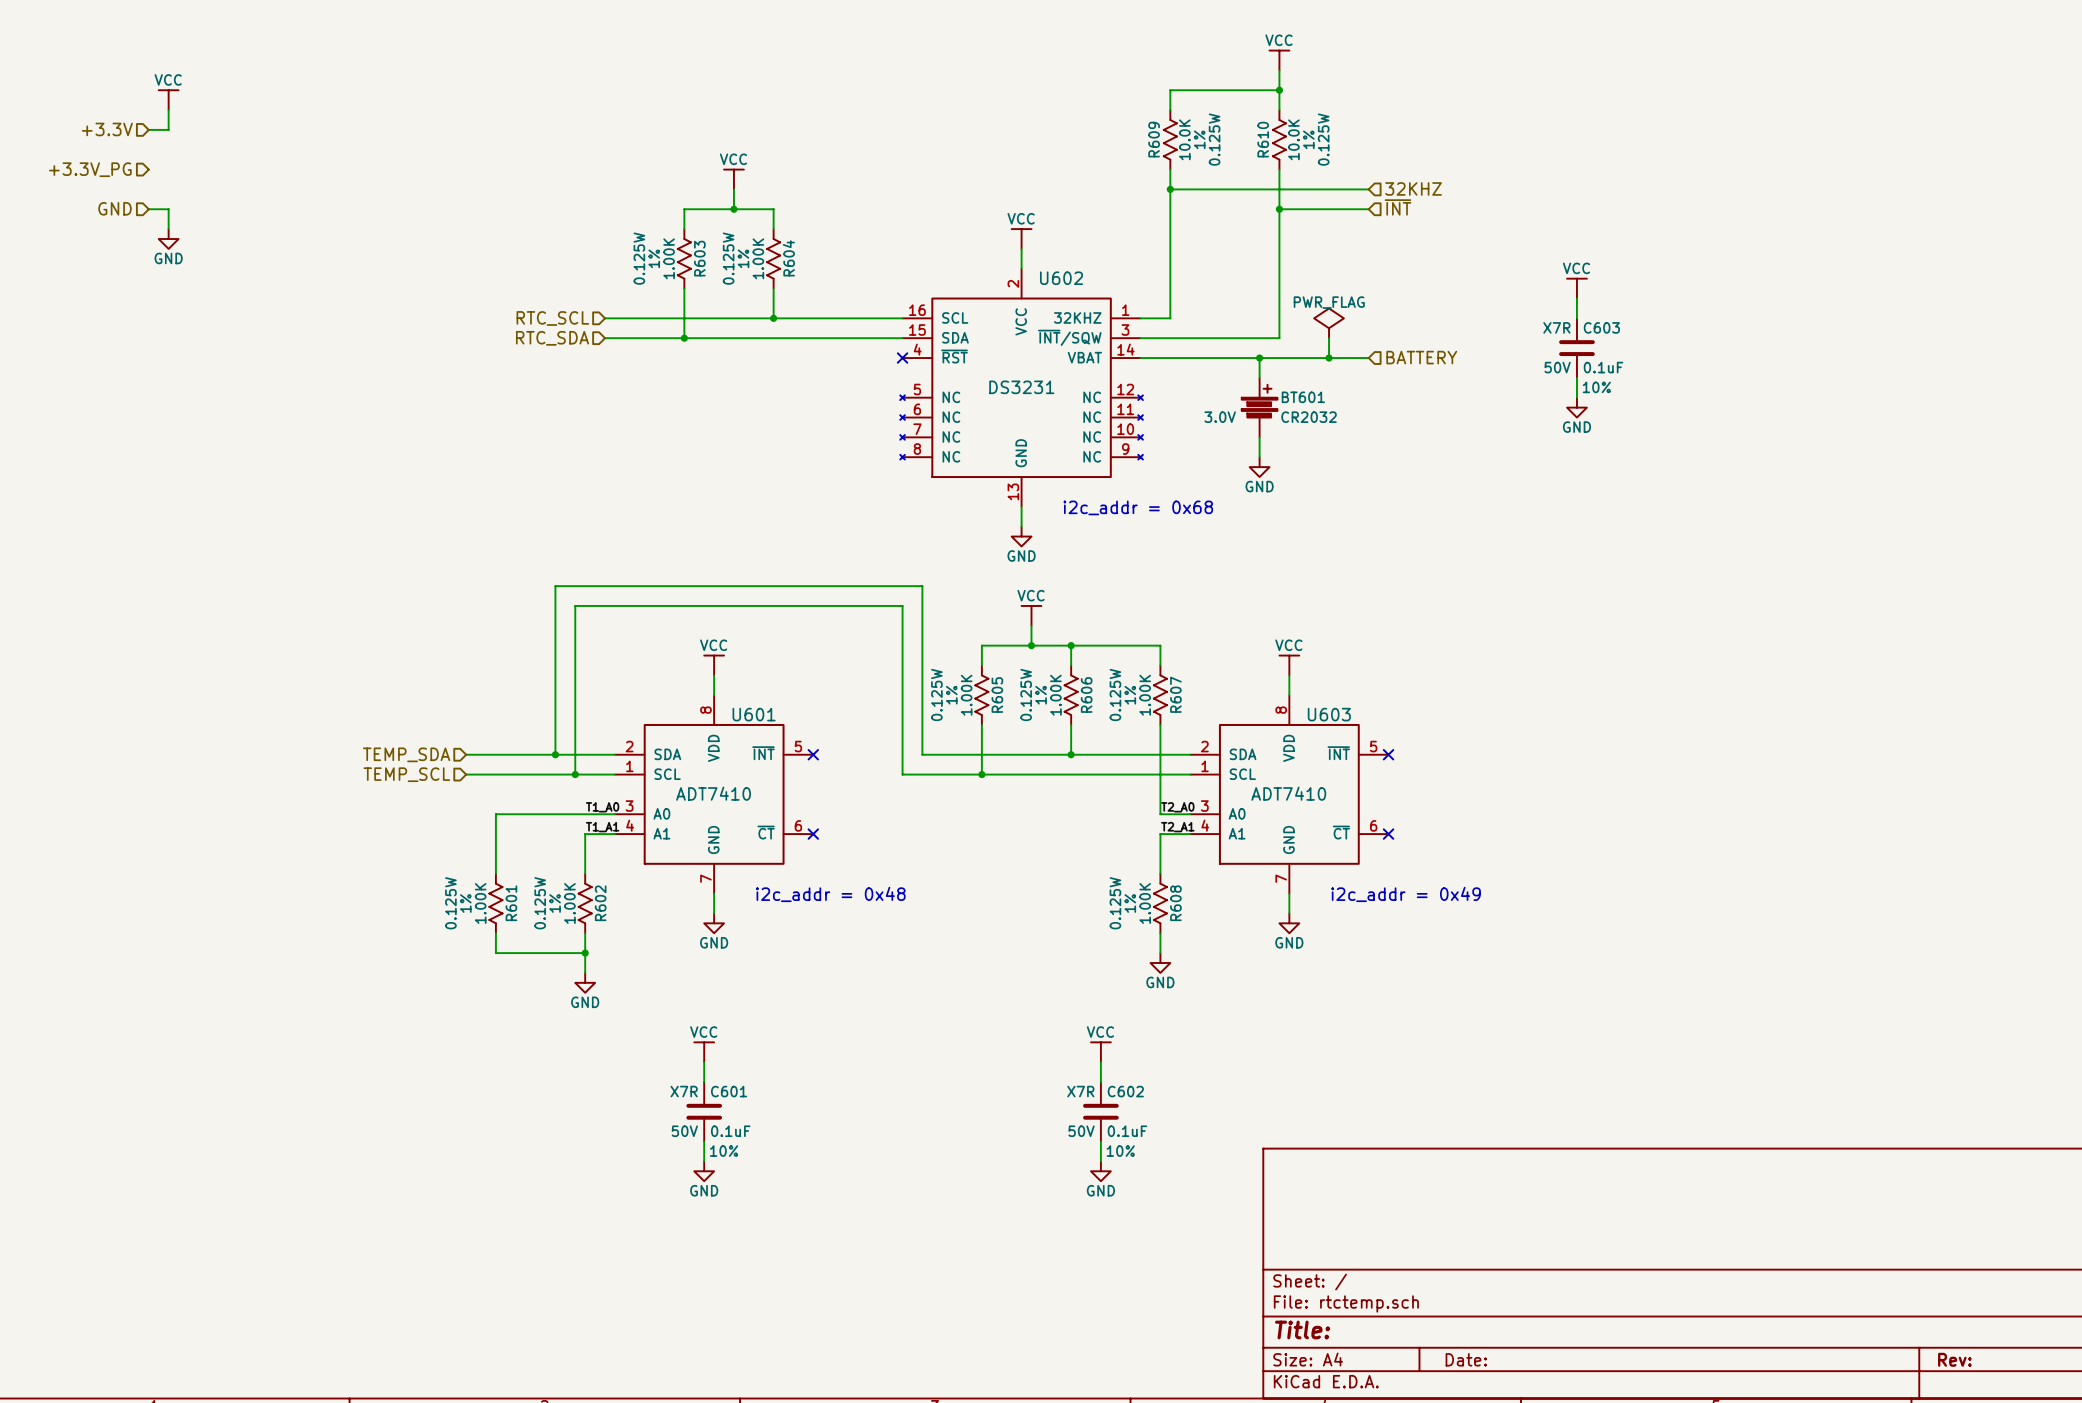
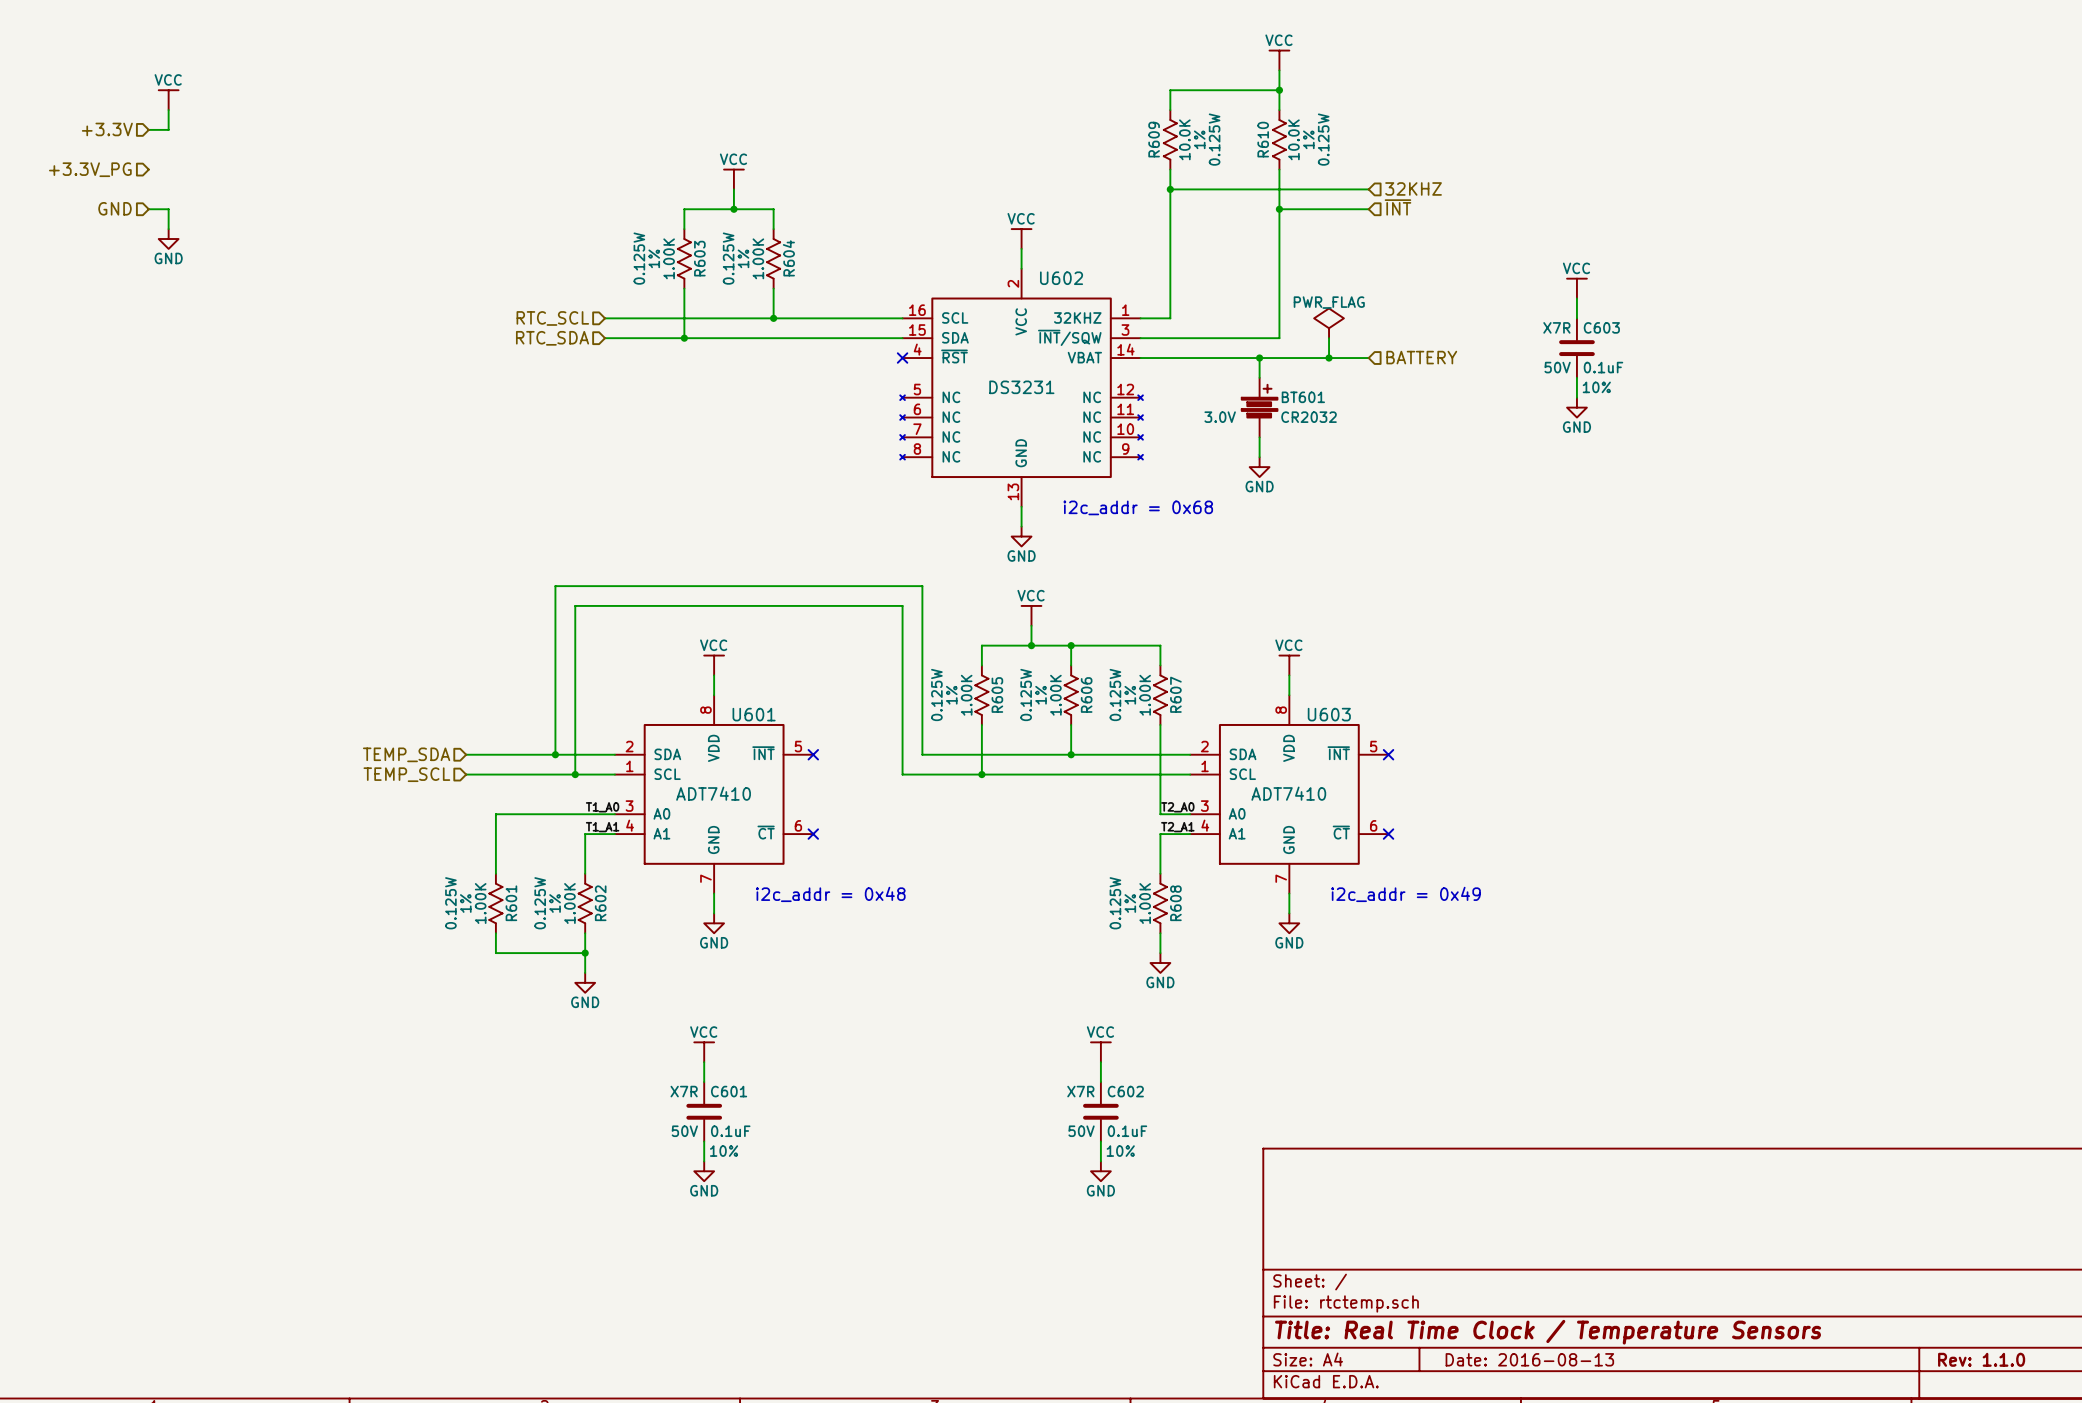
title block: Title: (1302, 1329) -> Title: Real Time Clock / Temperature Sensors (1548, 1332)
title block: Date: (1466, 1359) -> Date: 2016-08-13 (1529, 1359)
title block: Rev: (1954, 1359) -> Rev: 1.1.0 (1981, 1359)

